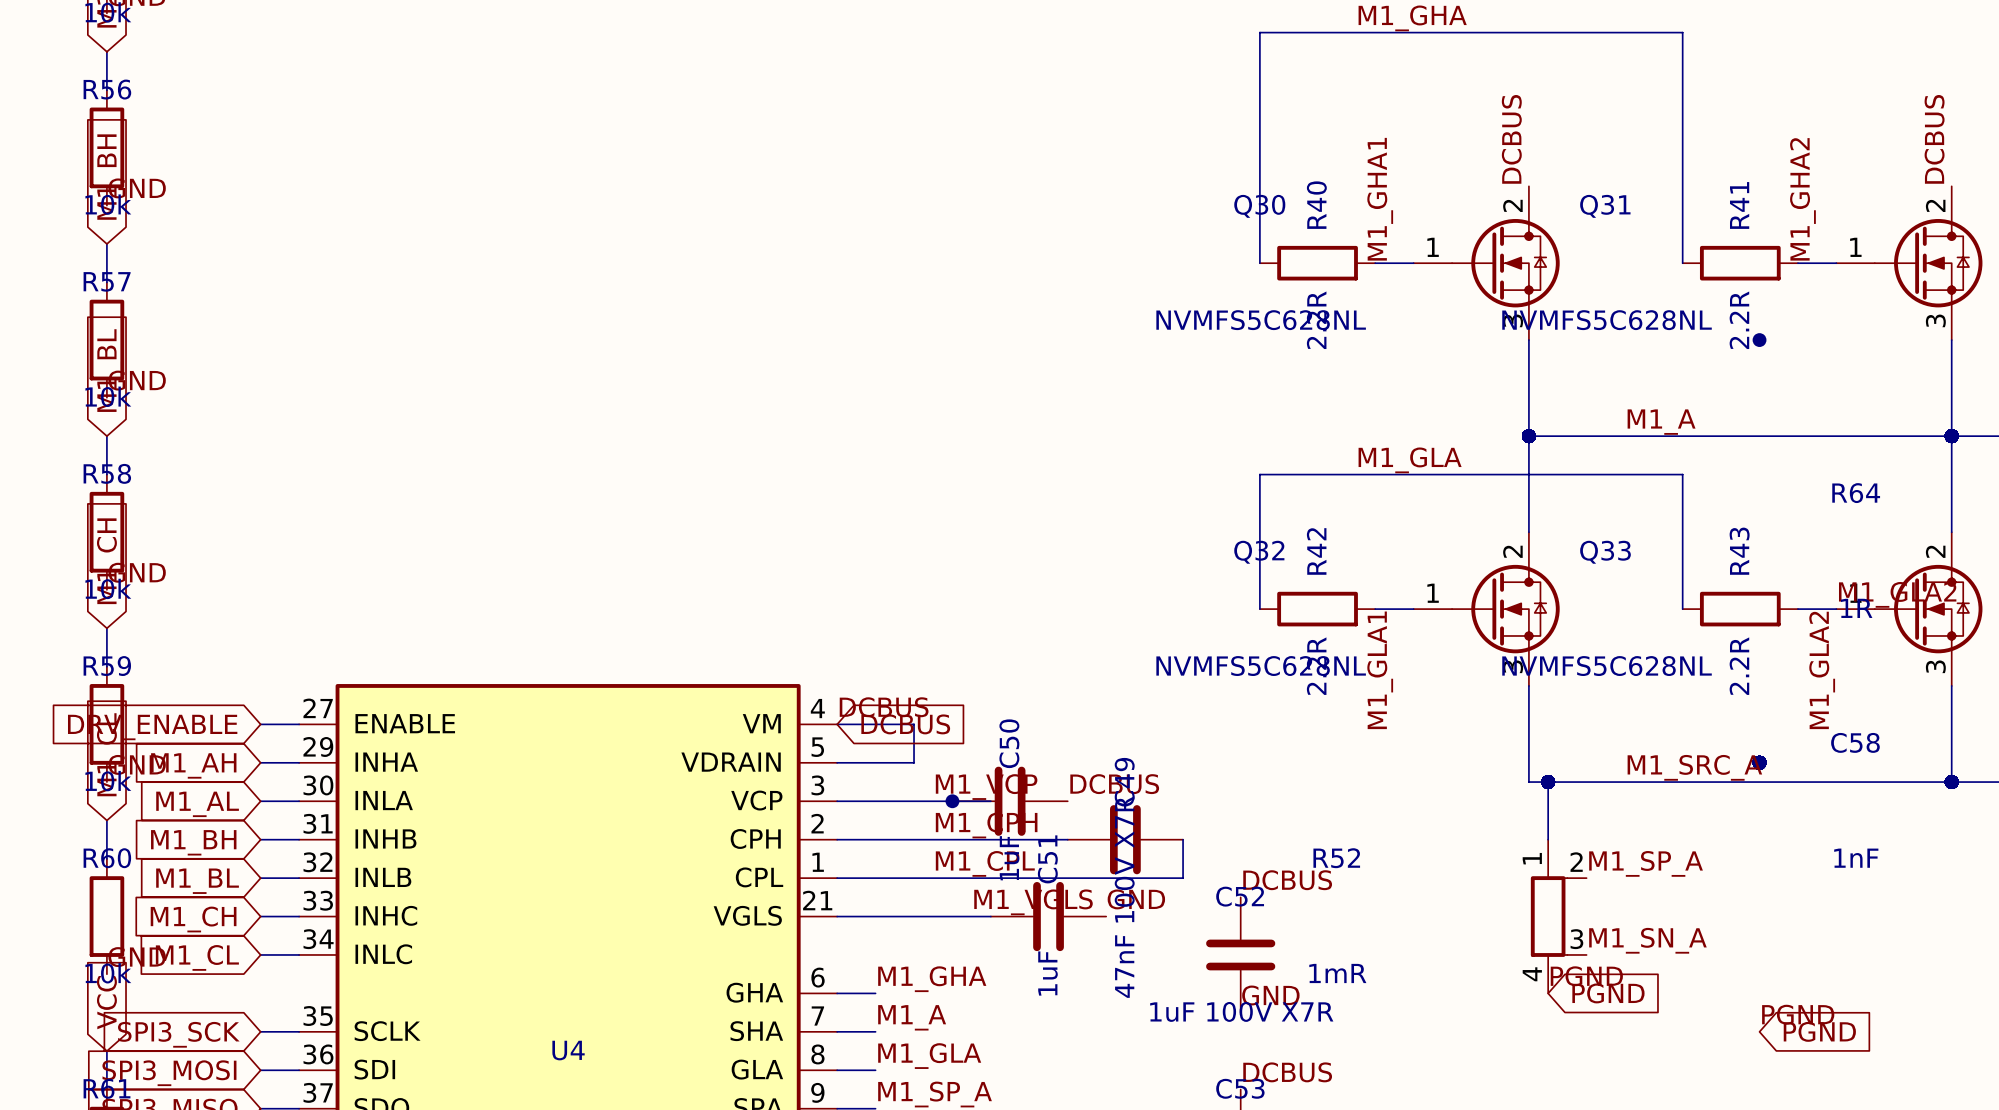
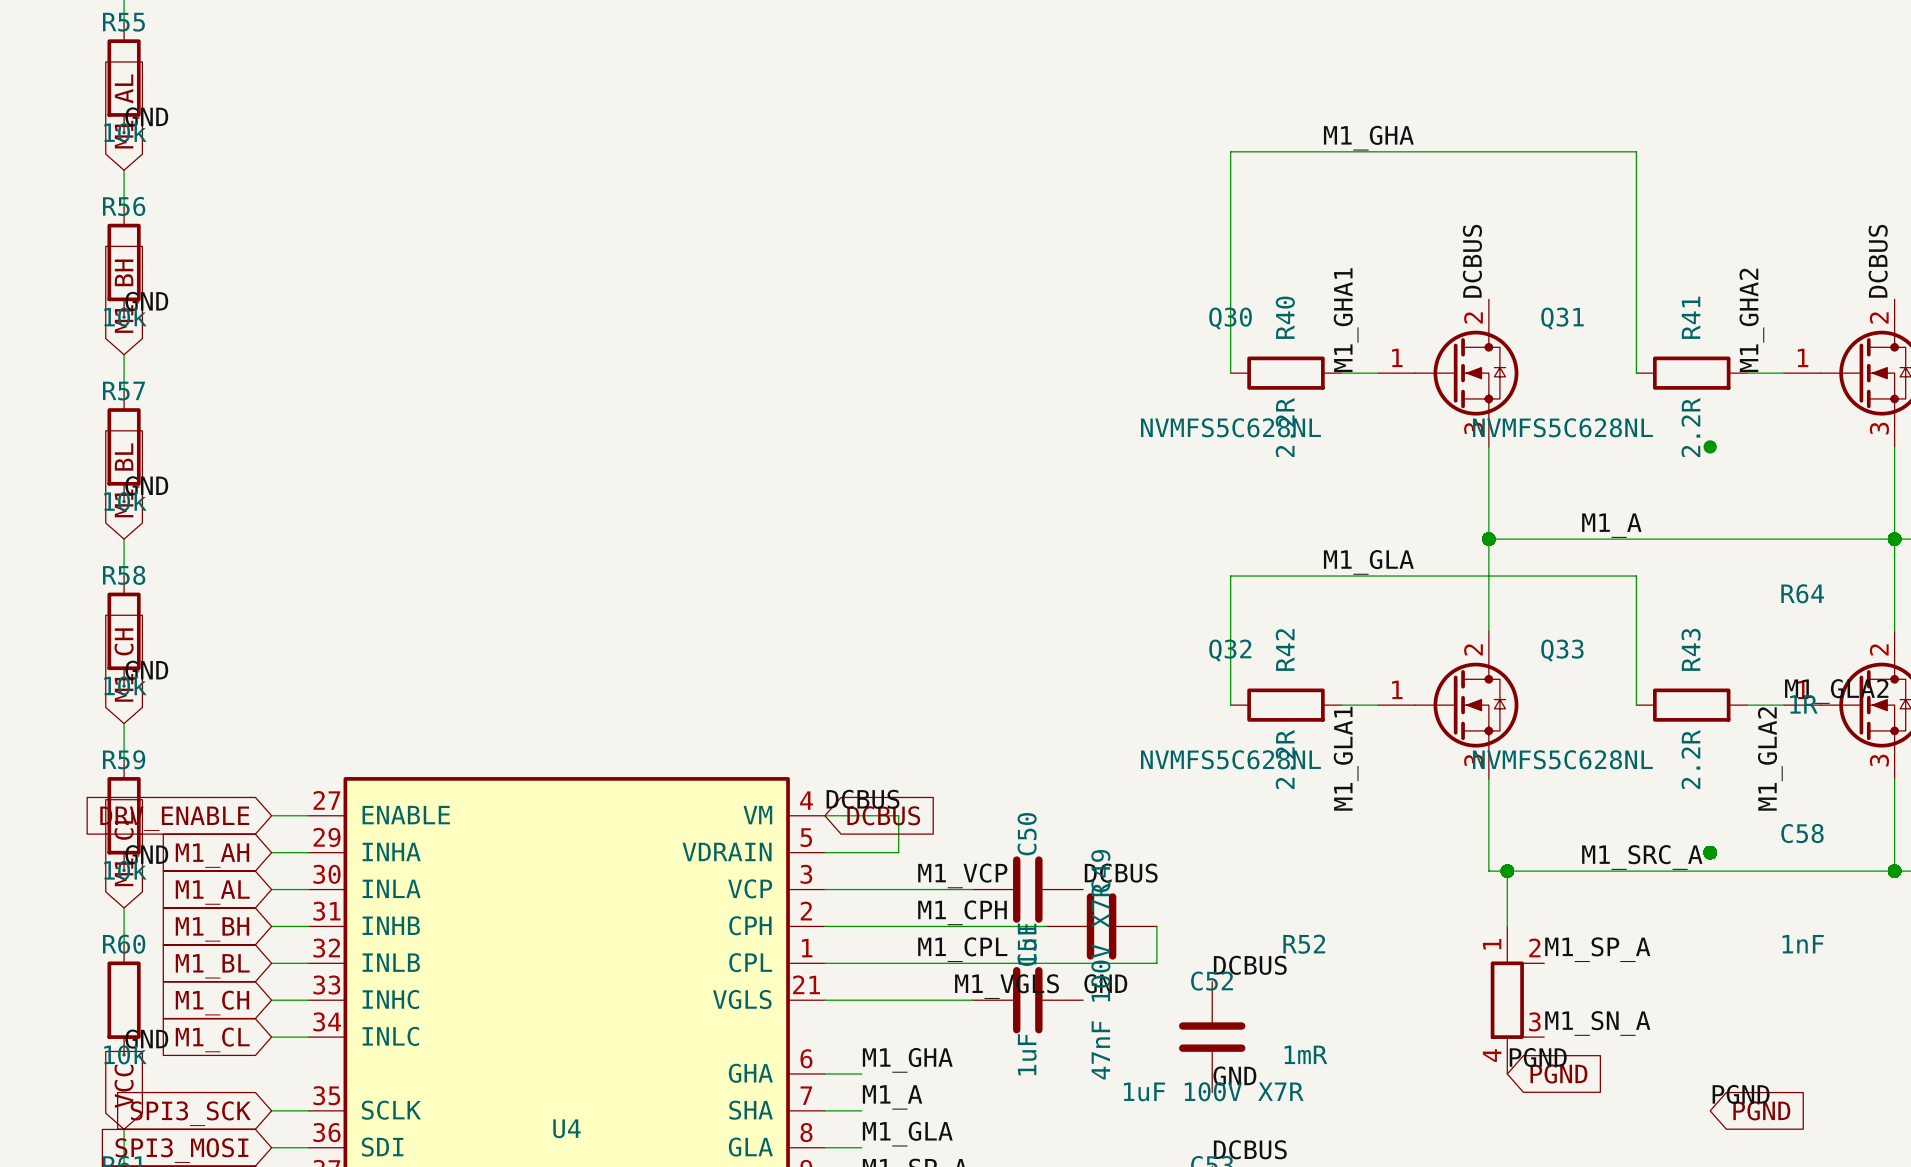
label position: DCBUS (1114, 784) -> DCBUS (1121, 873)
junction: (952, 801) -> none
C50 position: (1010, 801) -> (1027, 889)

